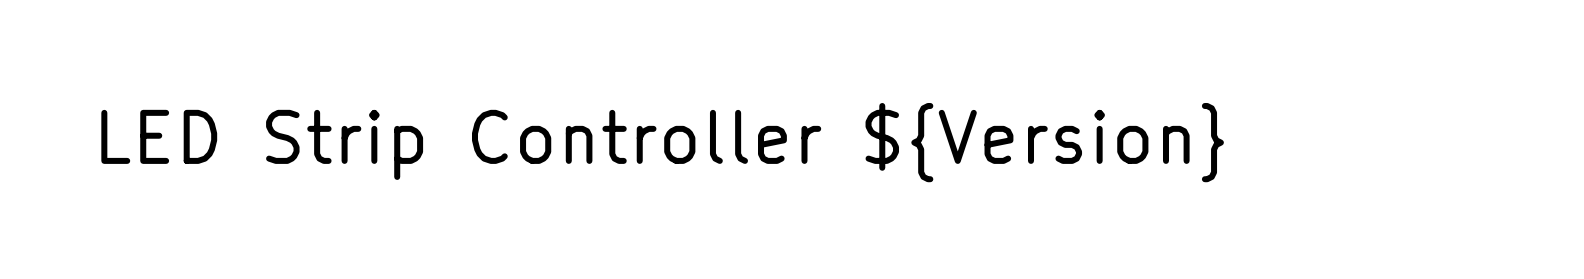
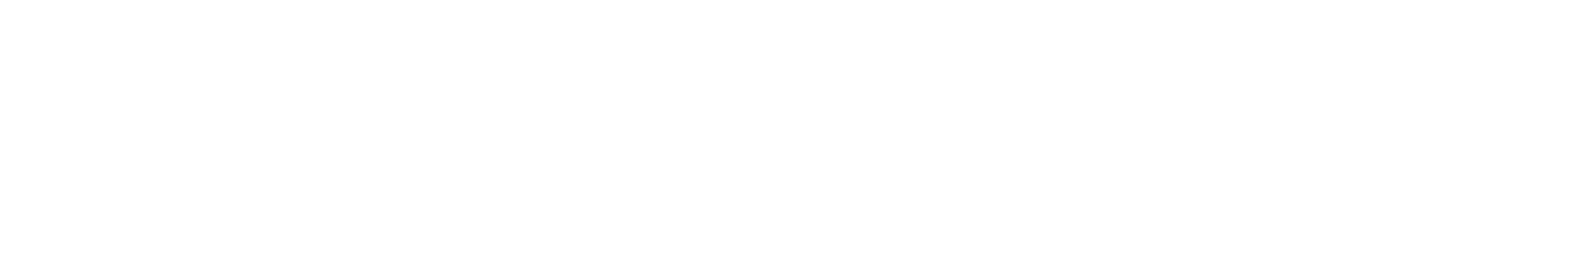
text: LED Strip Controller ${Version} (662, 142) -> none

